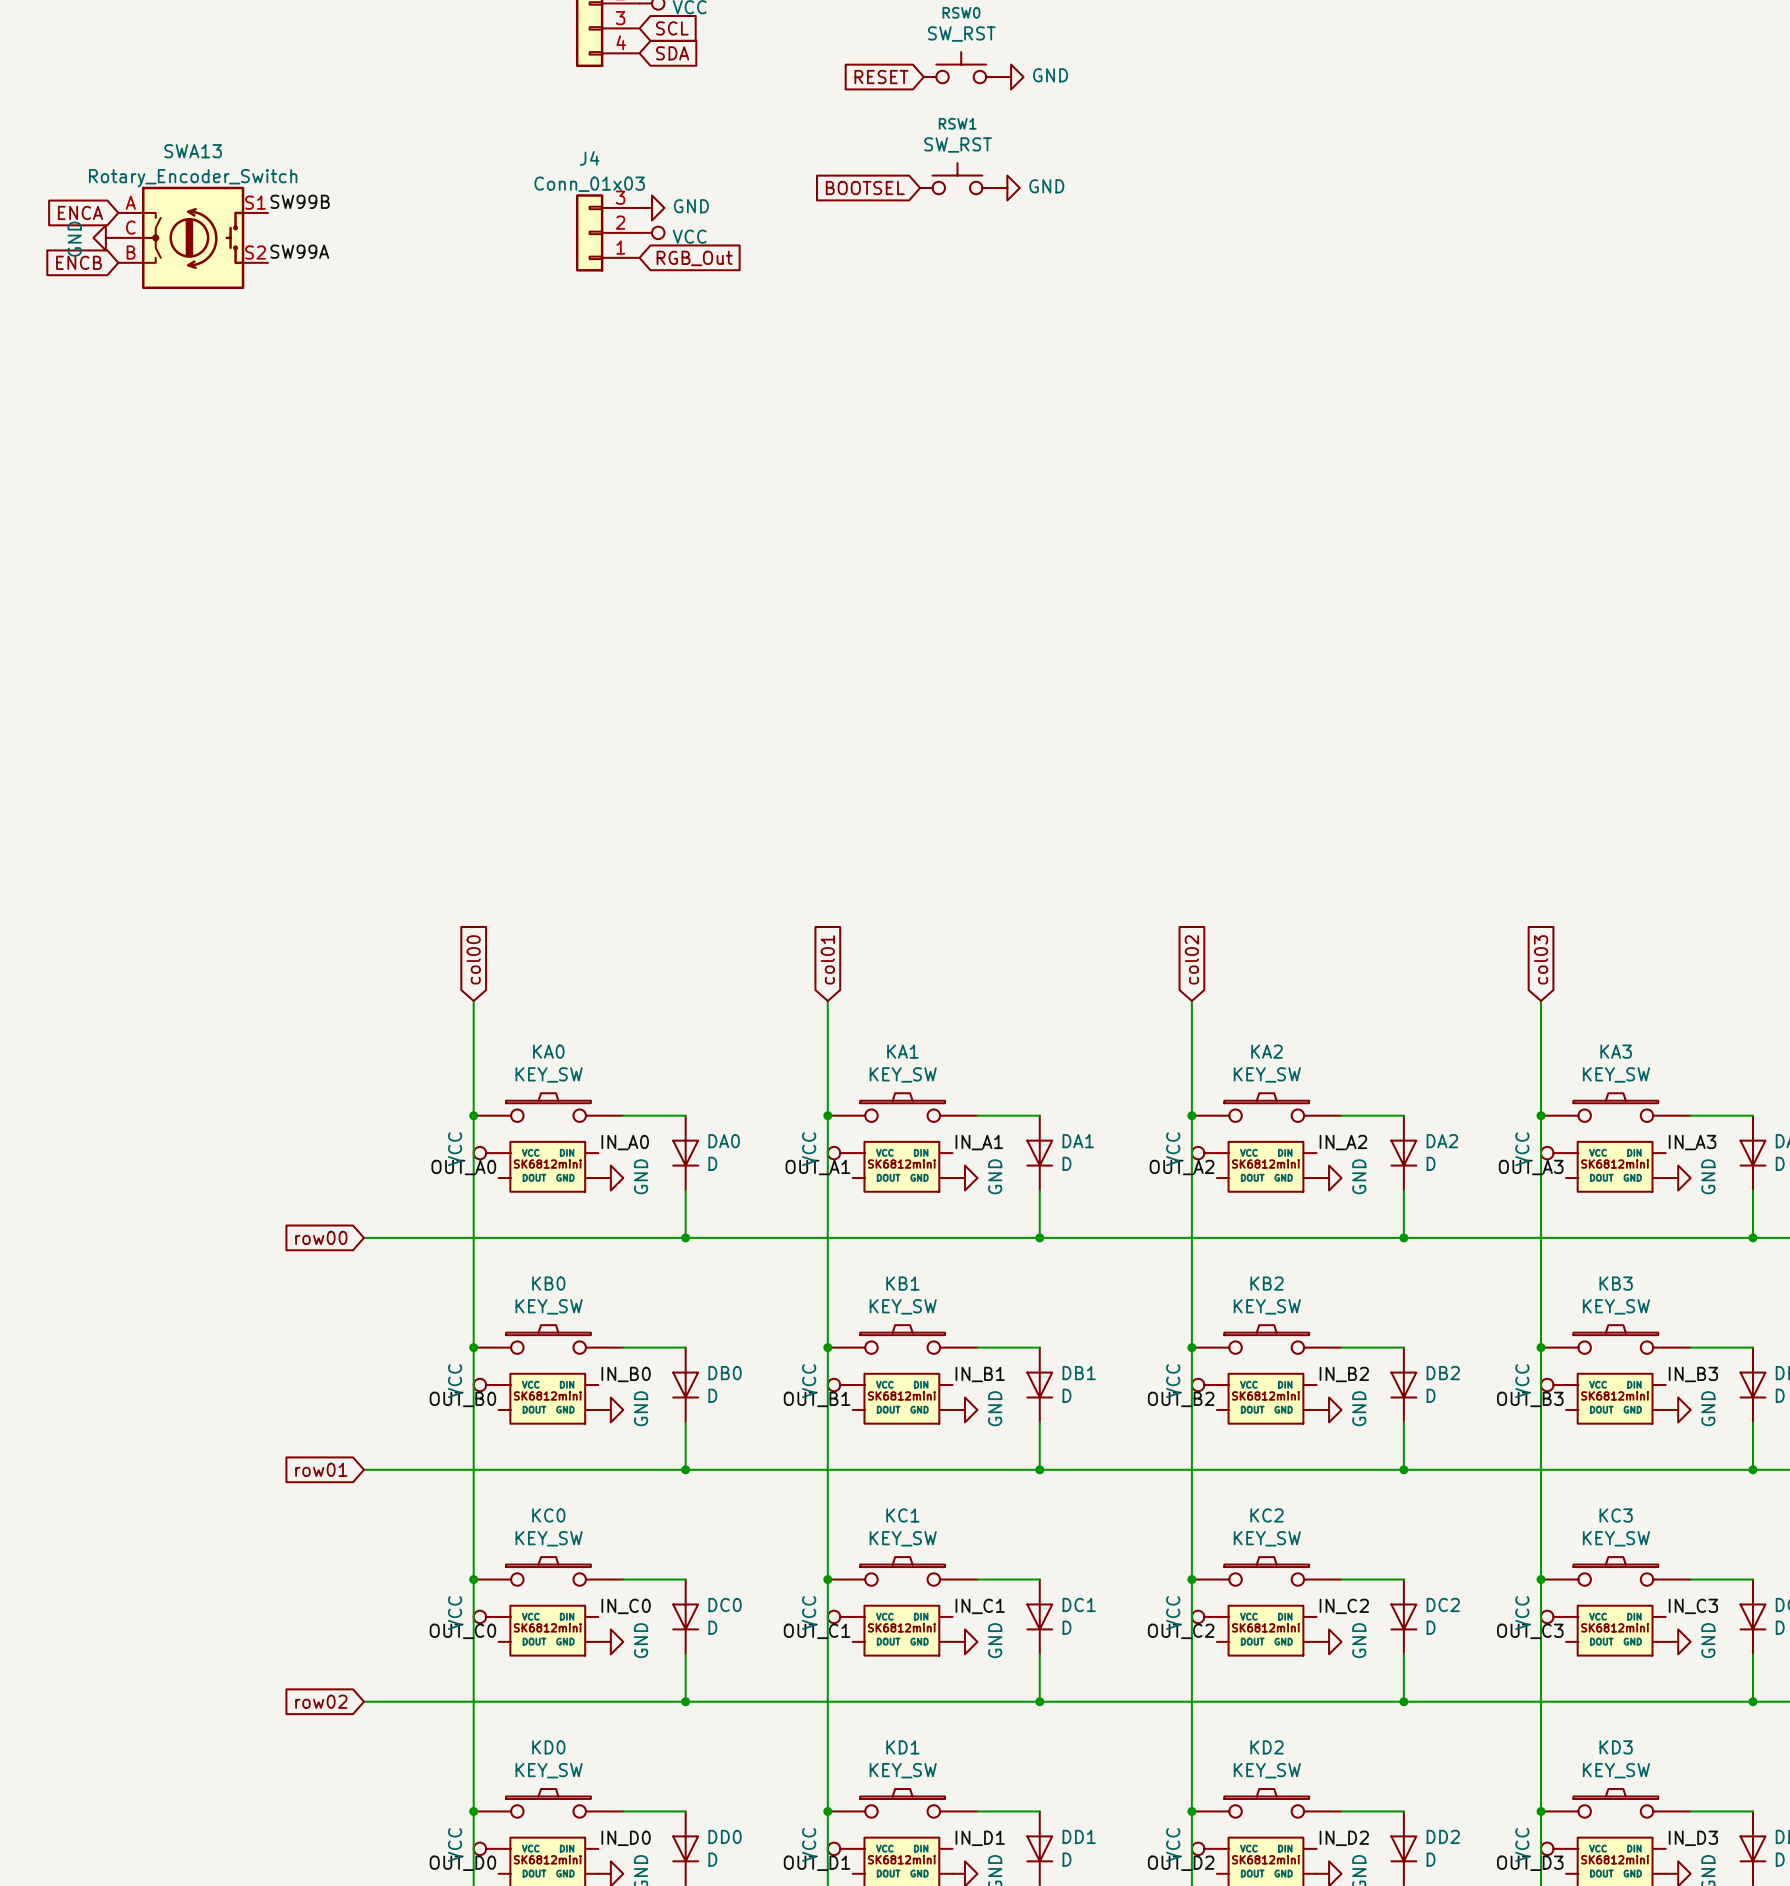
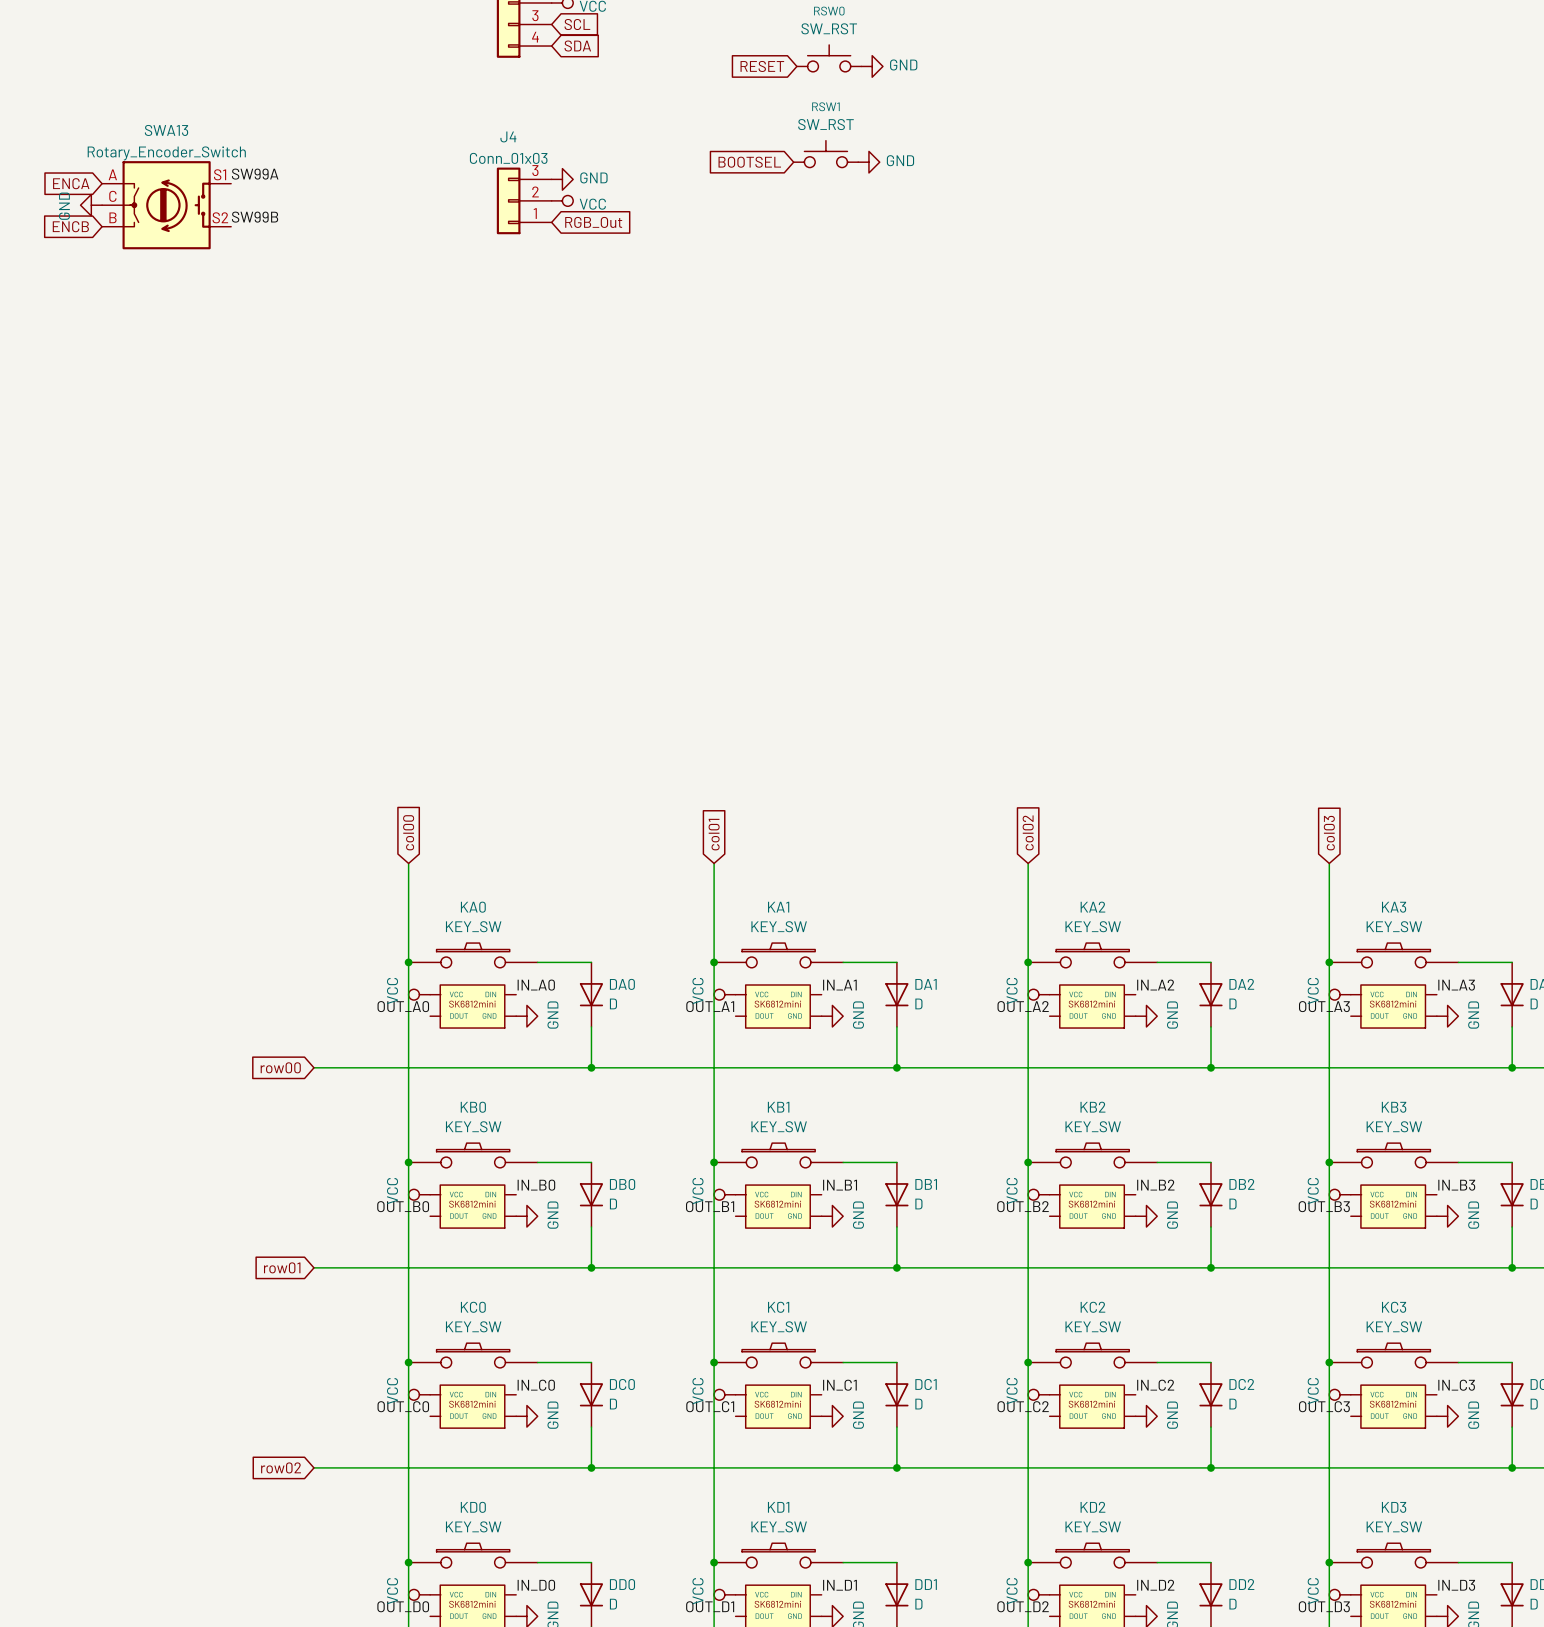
label: SW99B (300, 201) -> SW99A (255, 174)
label: SW99A (299, 251) -> SW99B (255, 217)

